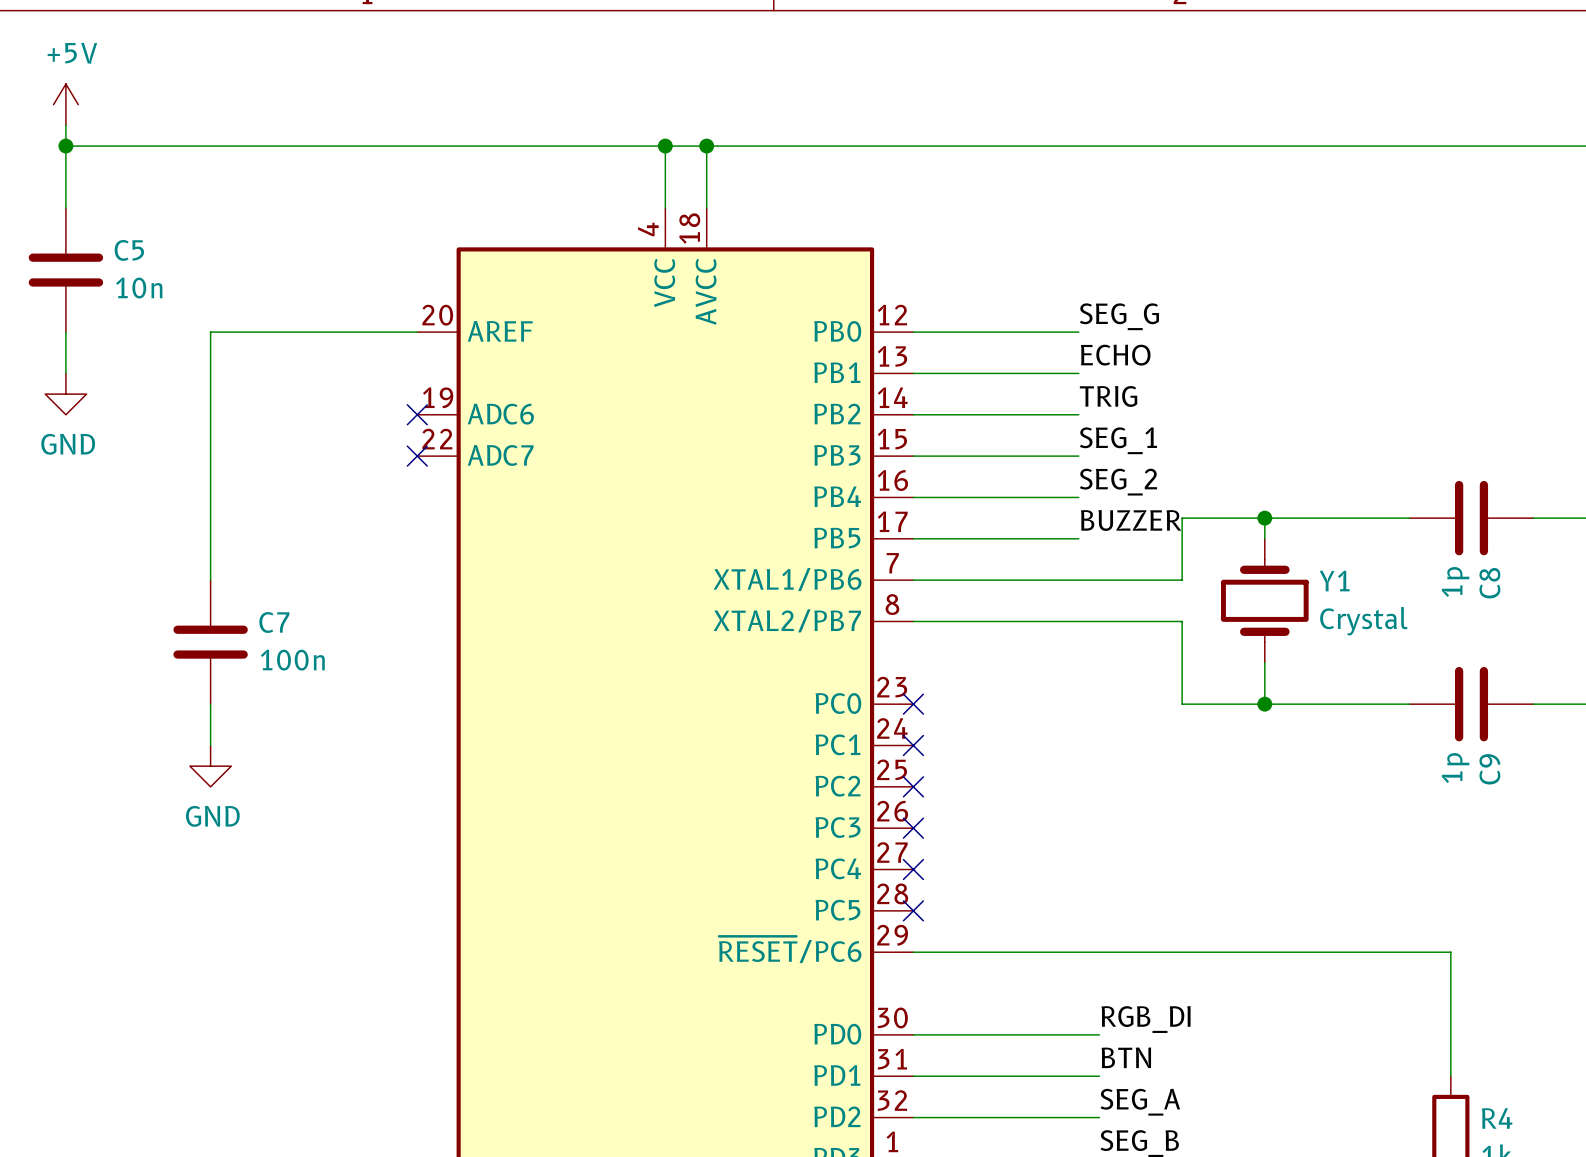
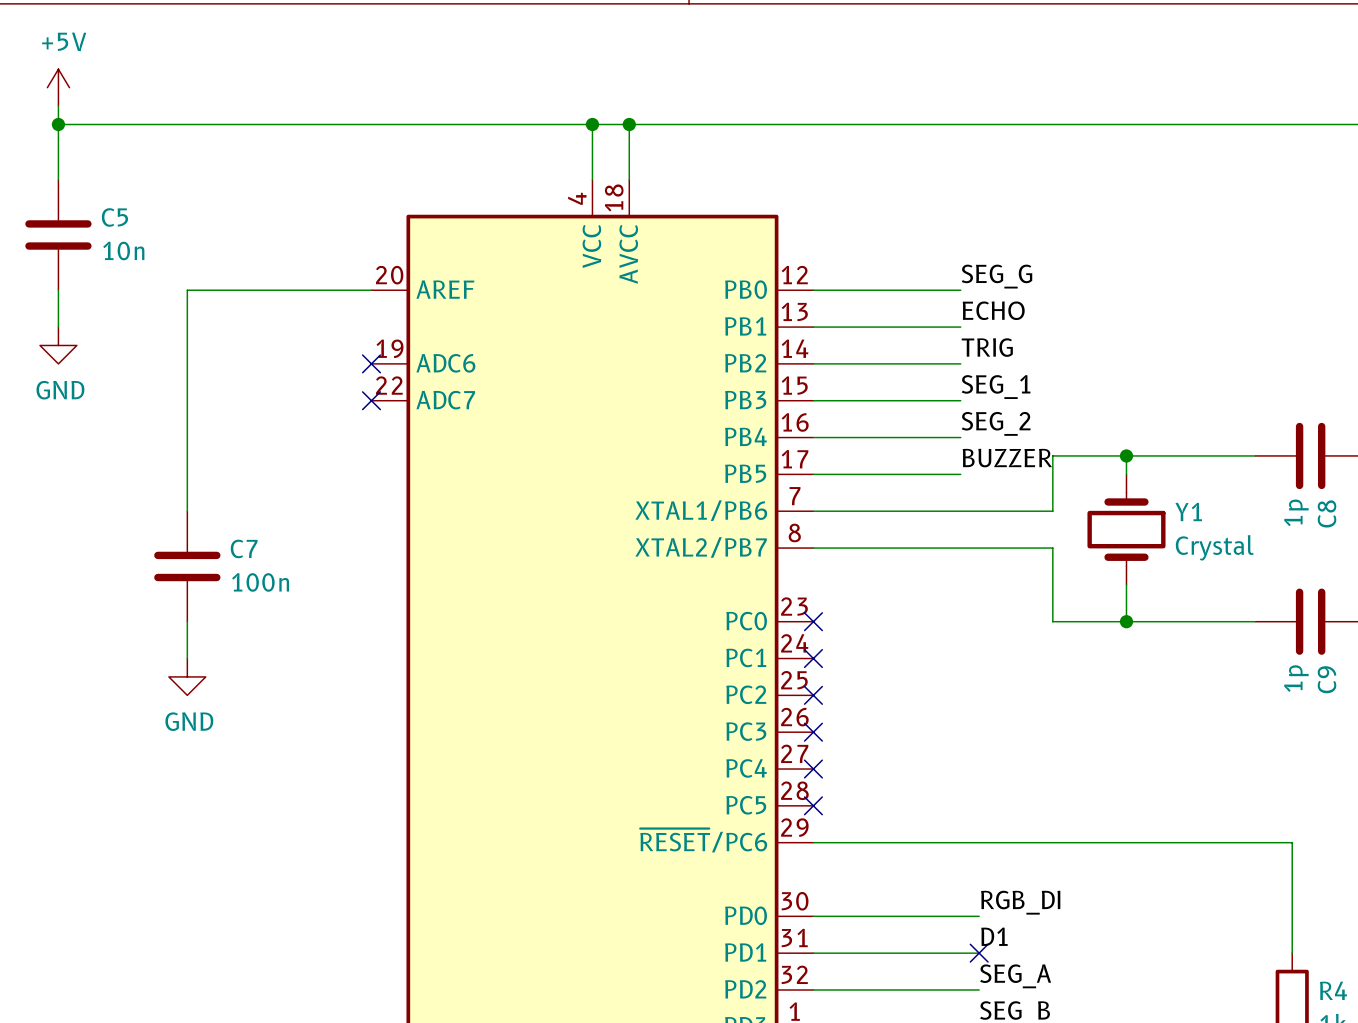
label: BTN (1126, 1057) -> D1 (994, 936)
no-connect mark: none -> (979, 953)

